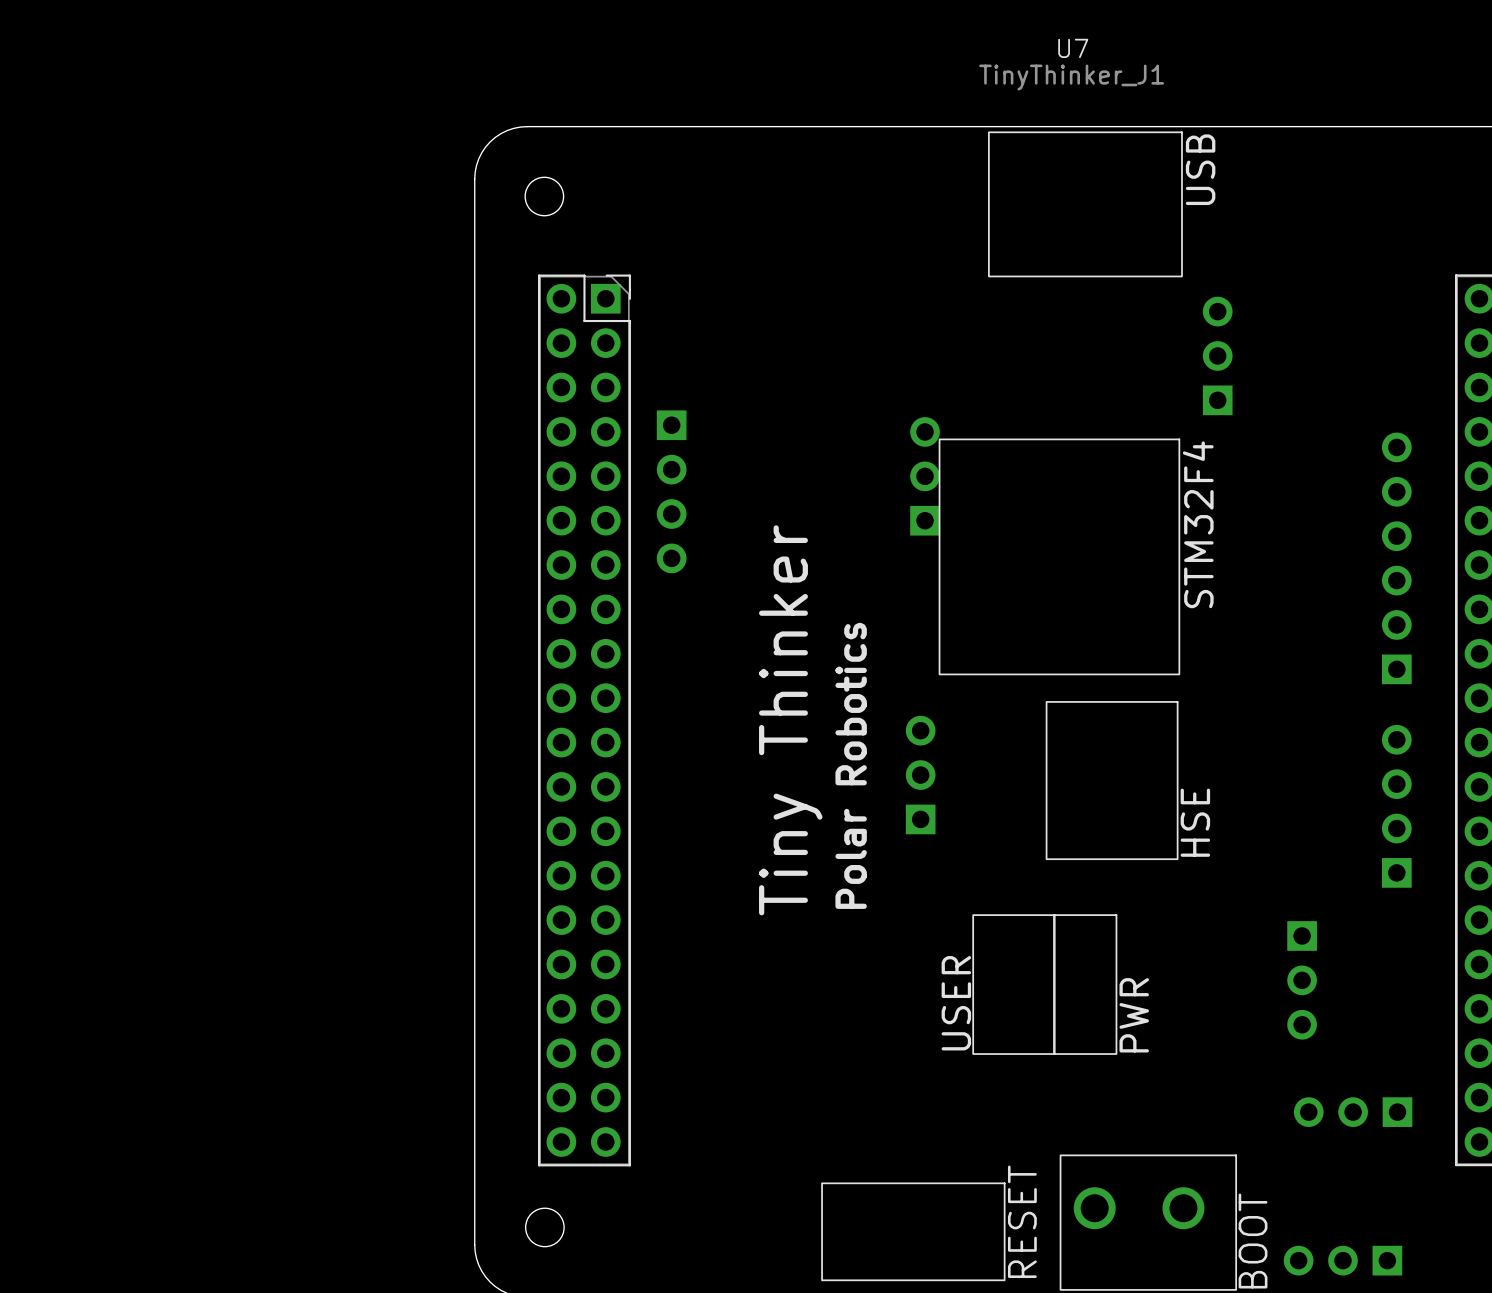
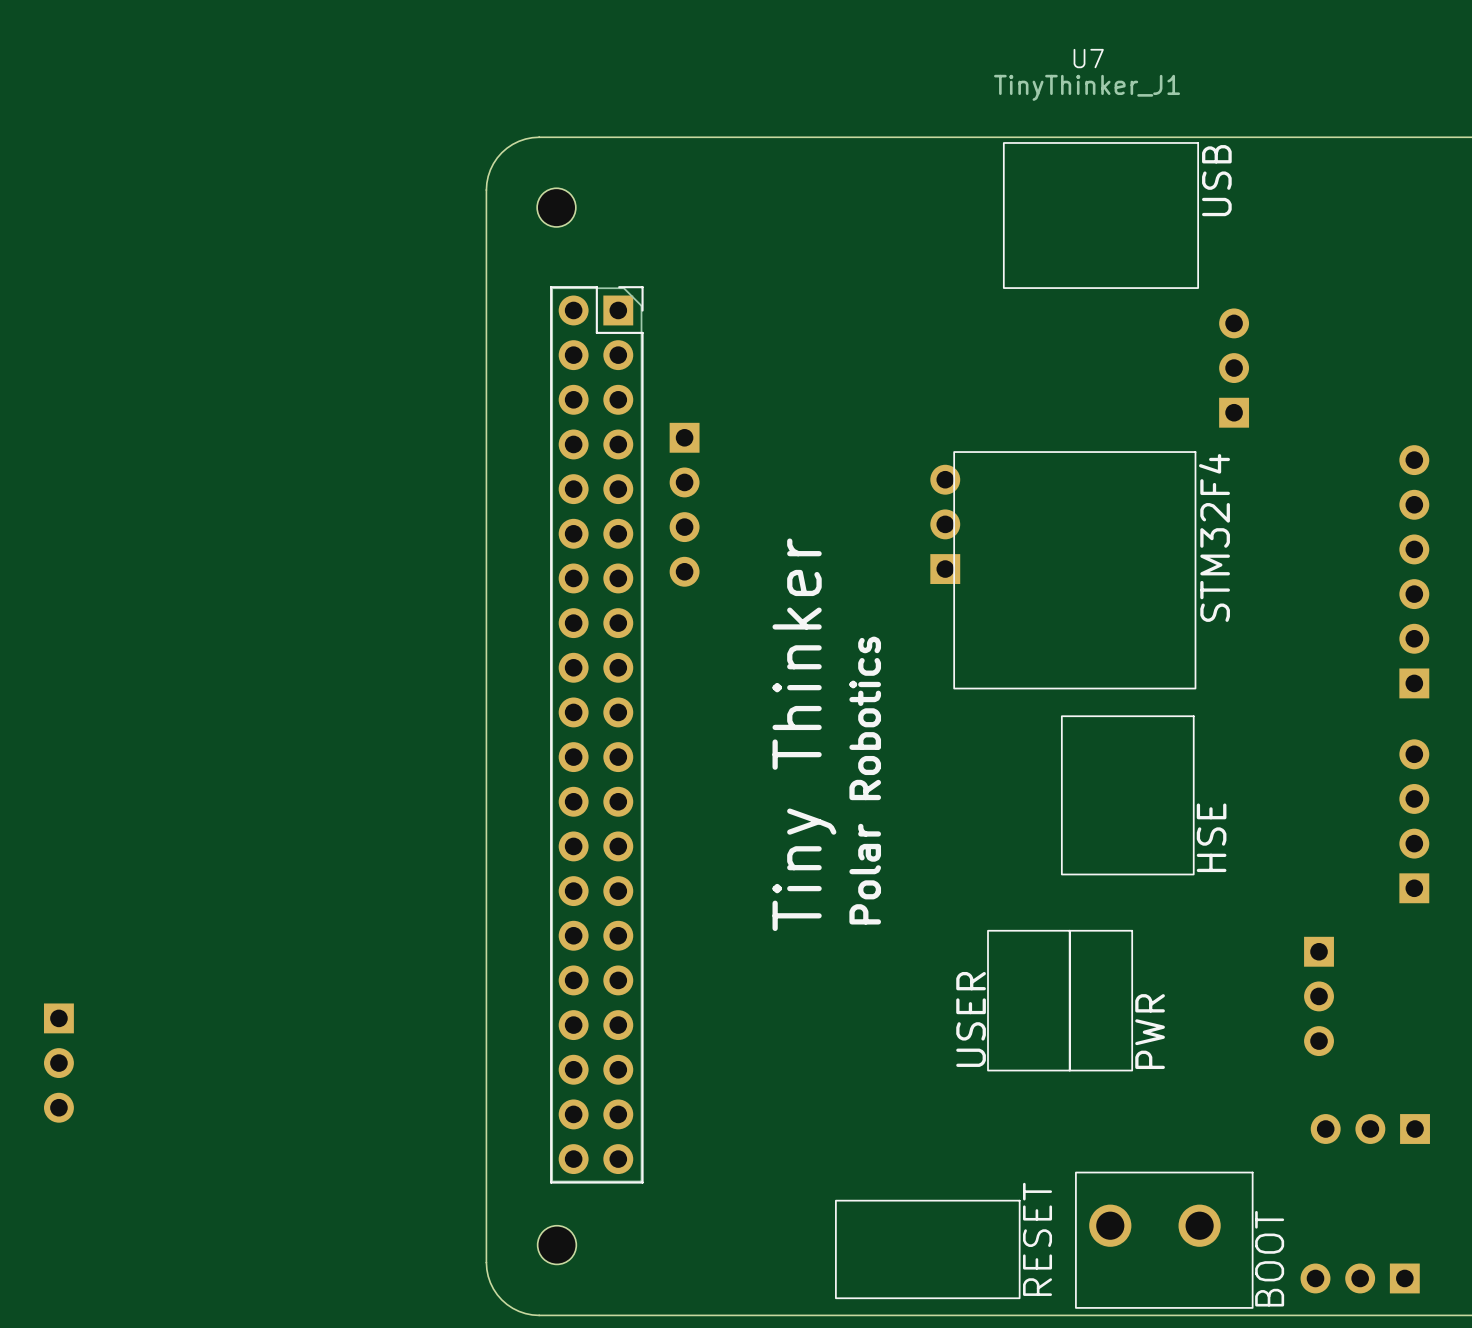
part position: (925, 476) -> (945, 524)
part: (920, 775) -> none
part: none -> (58, 1063)

